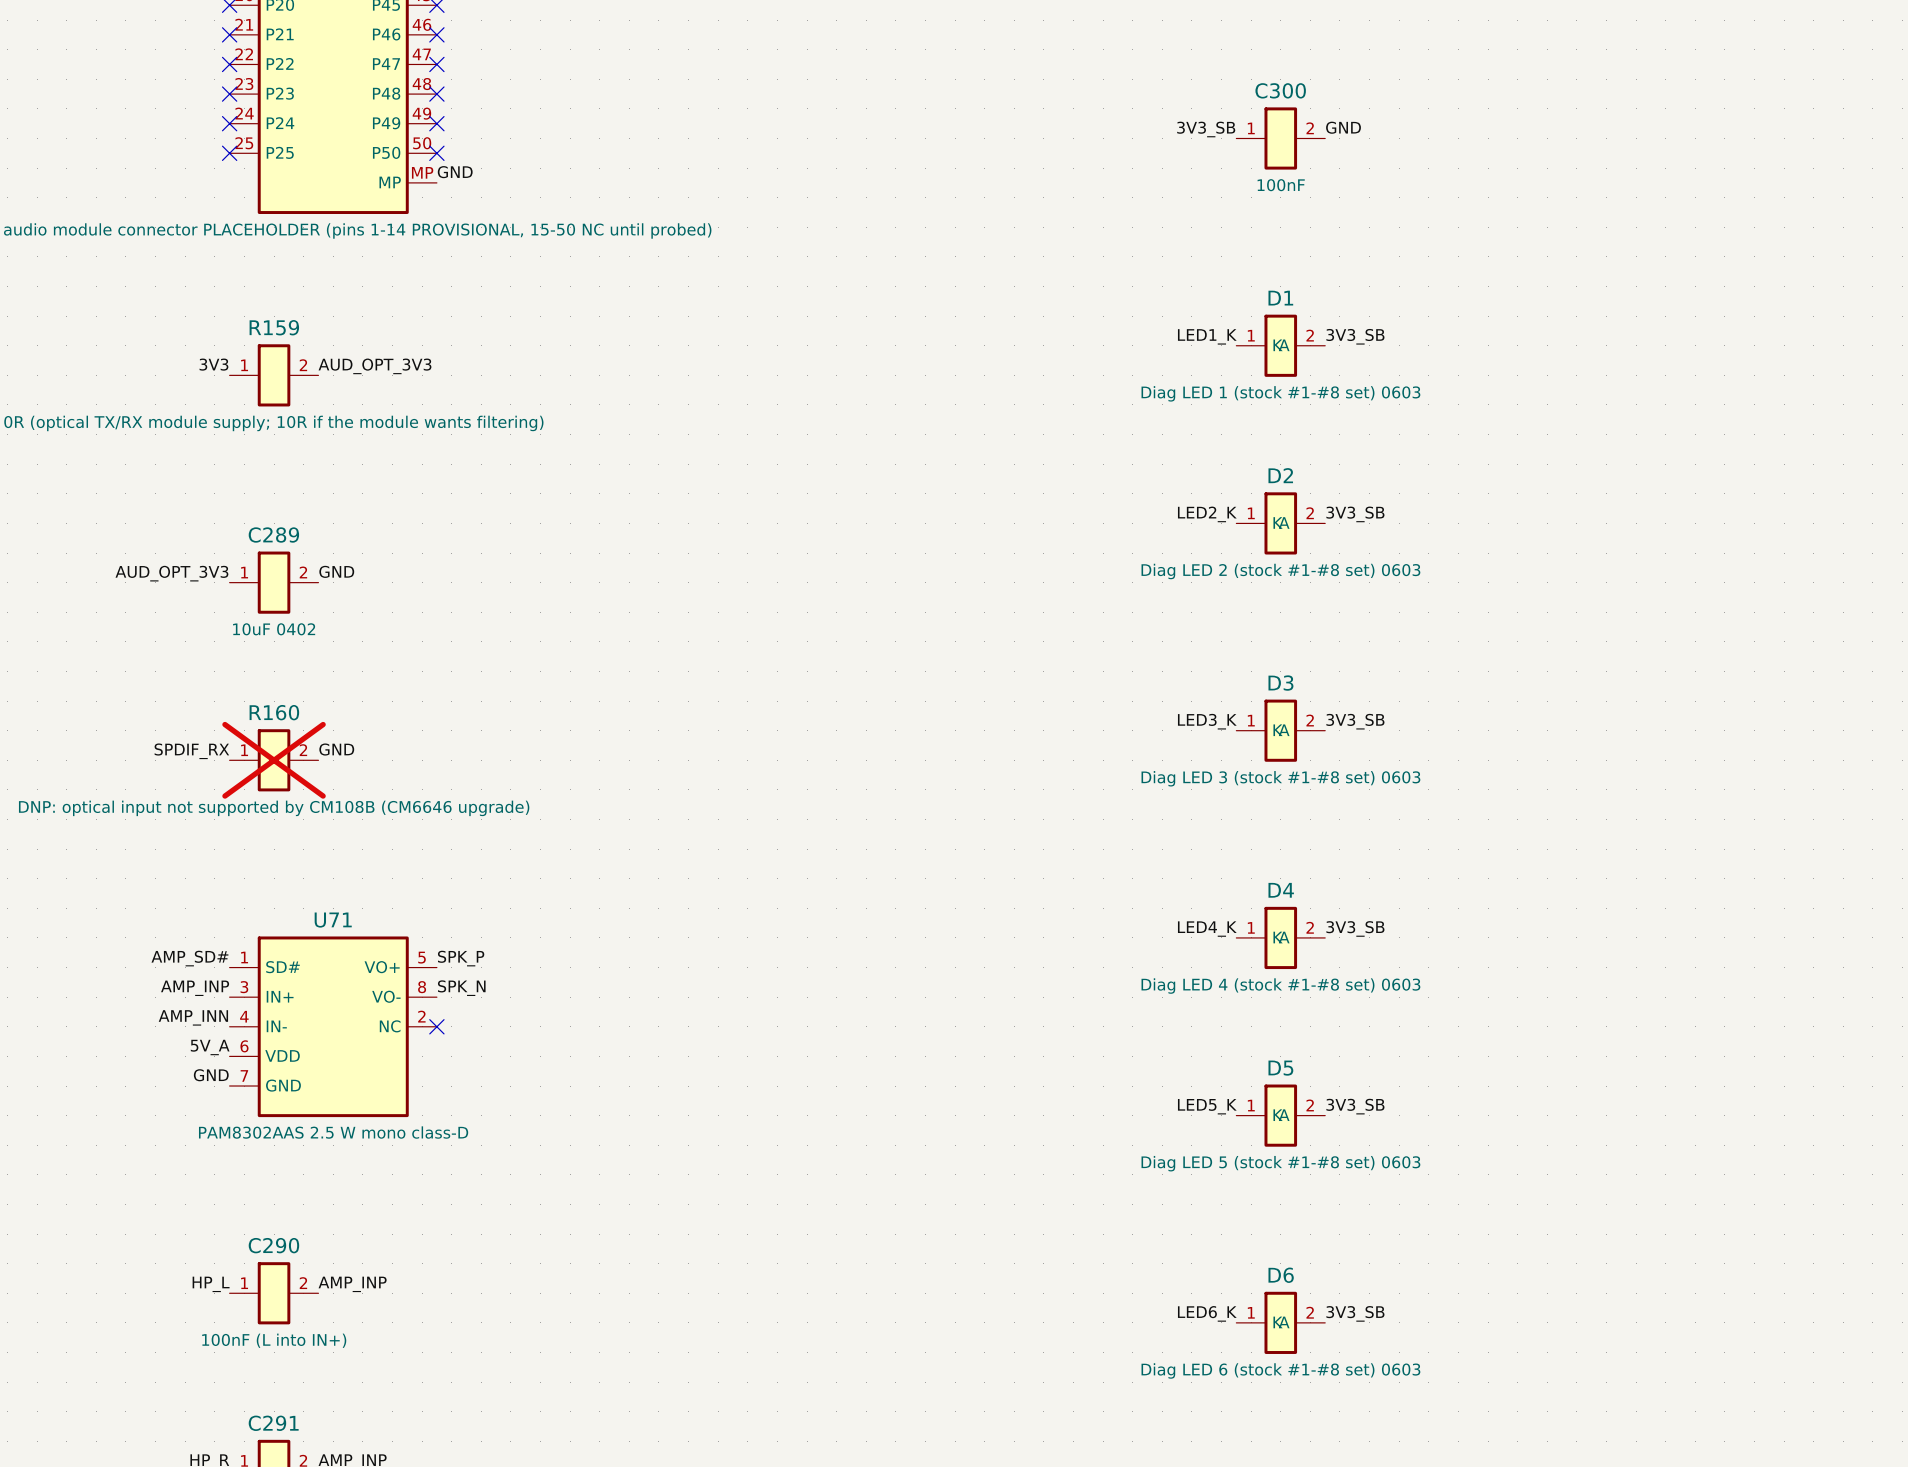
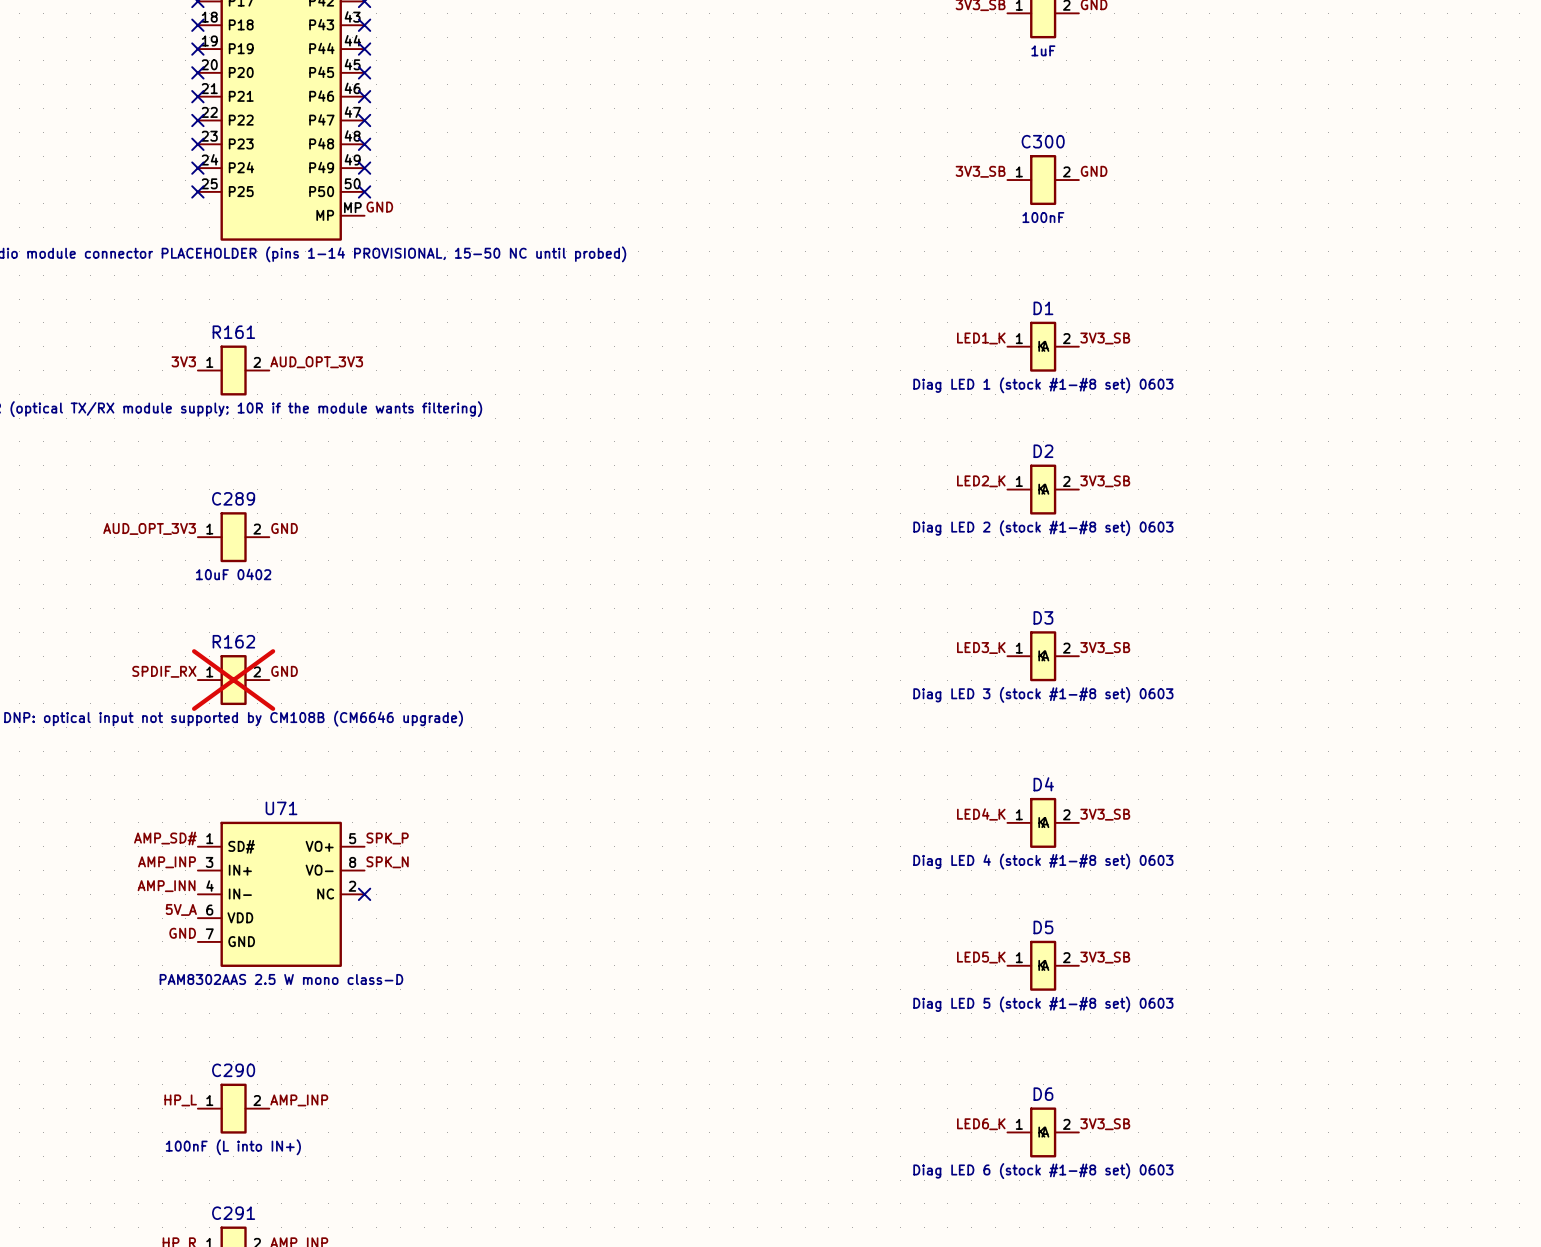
R159 name: R159 (274, 327) -> R161 (233, 332)
R160 name: R160 (274, 712) -> R162 (233, 641)

